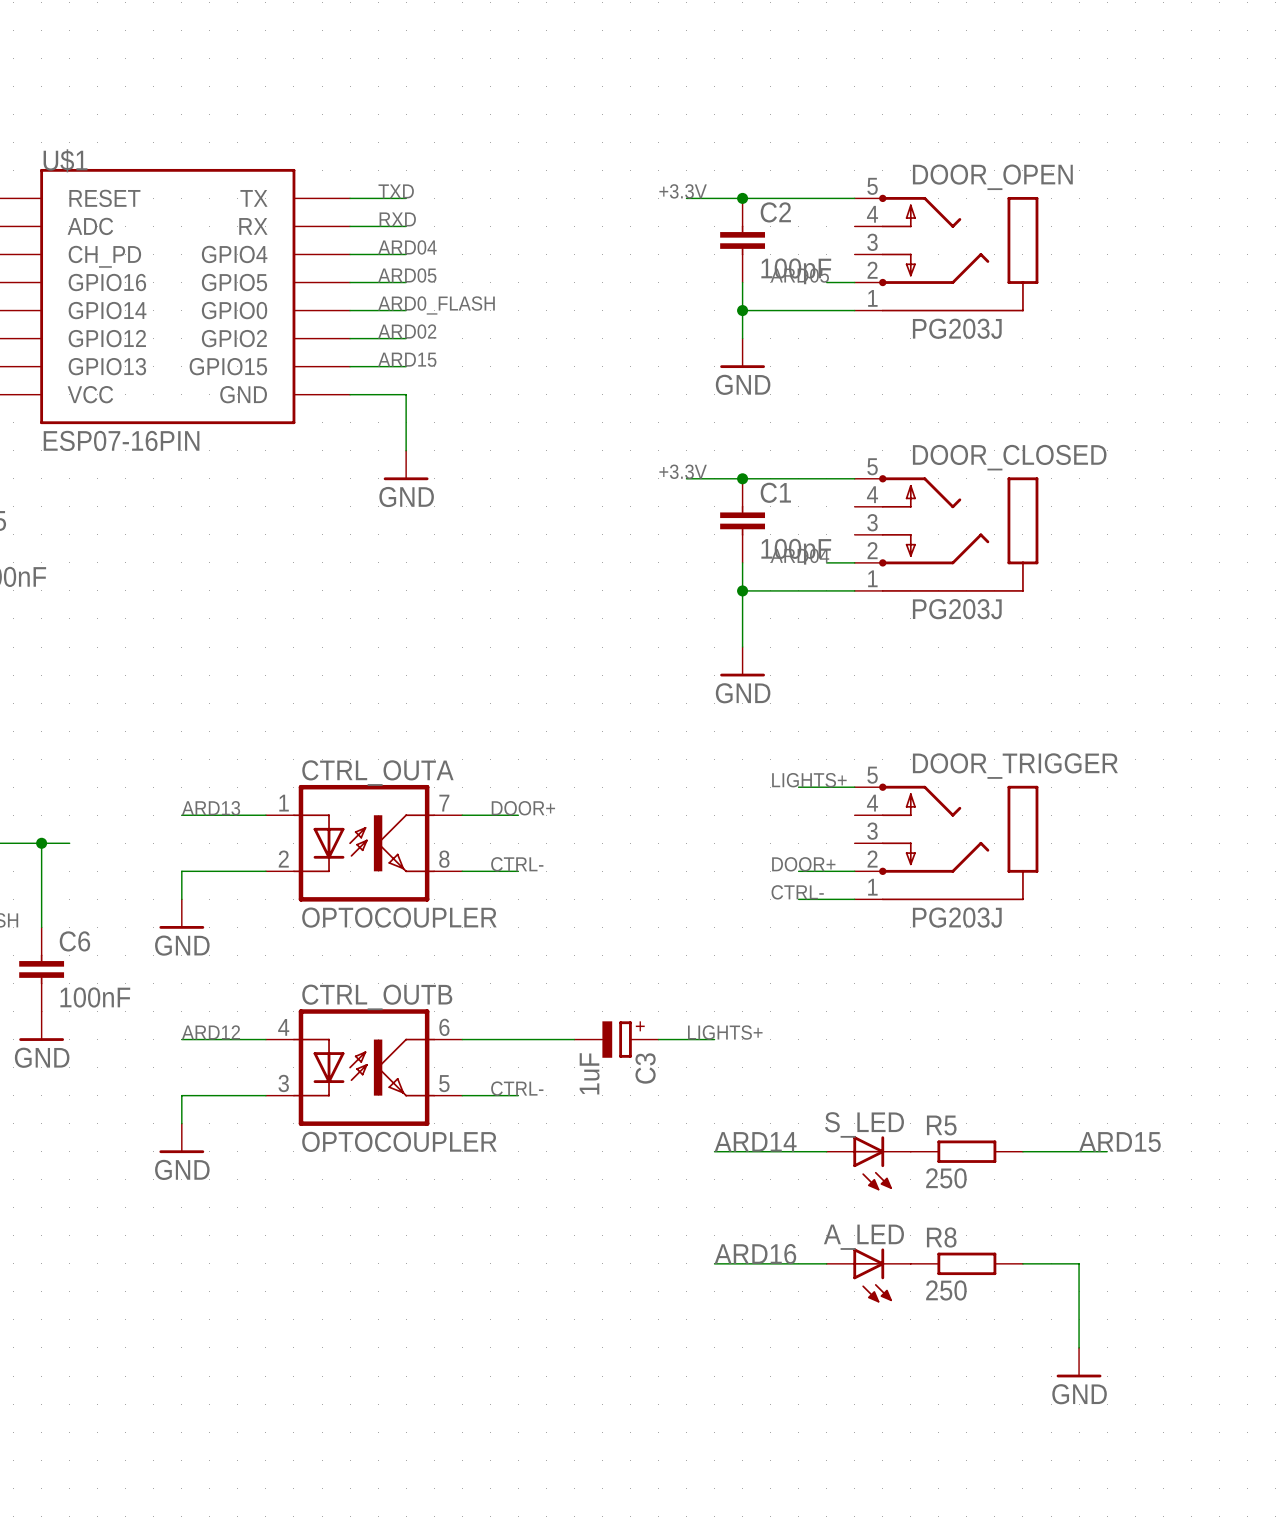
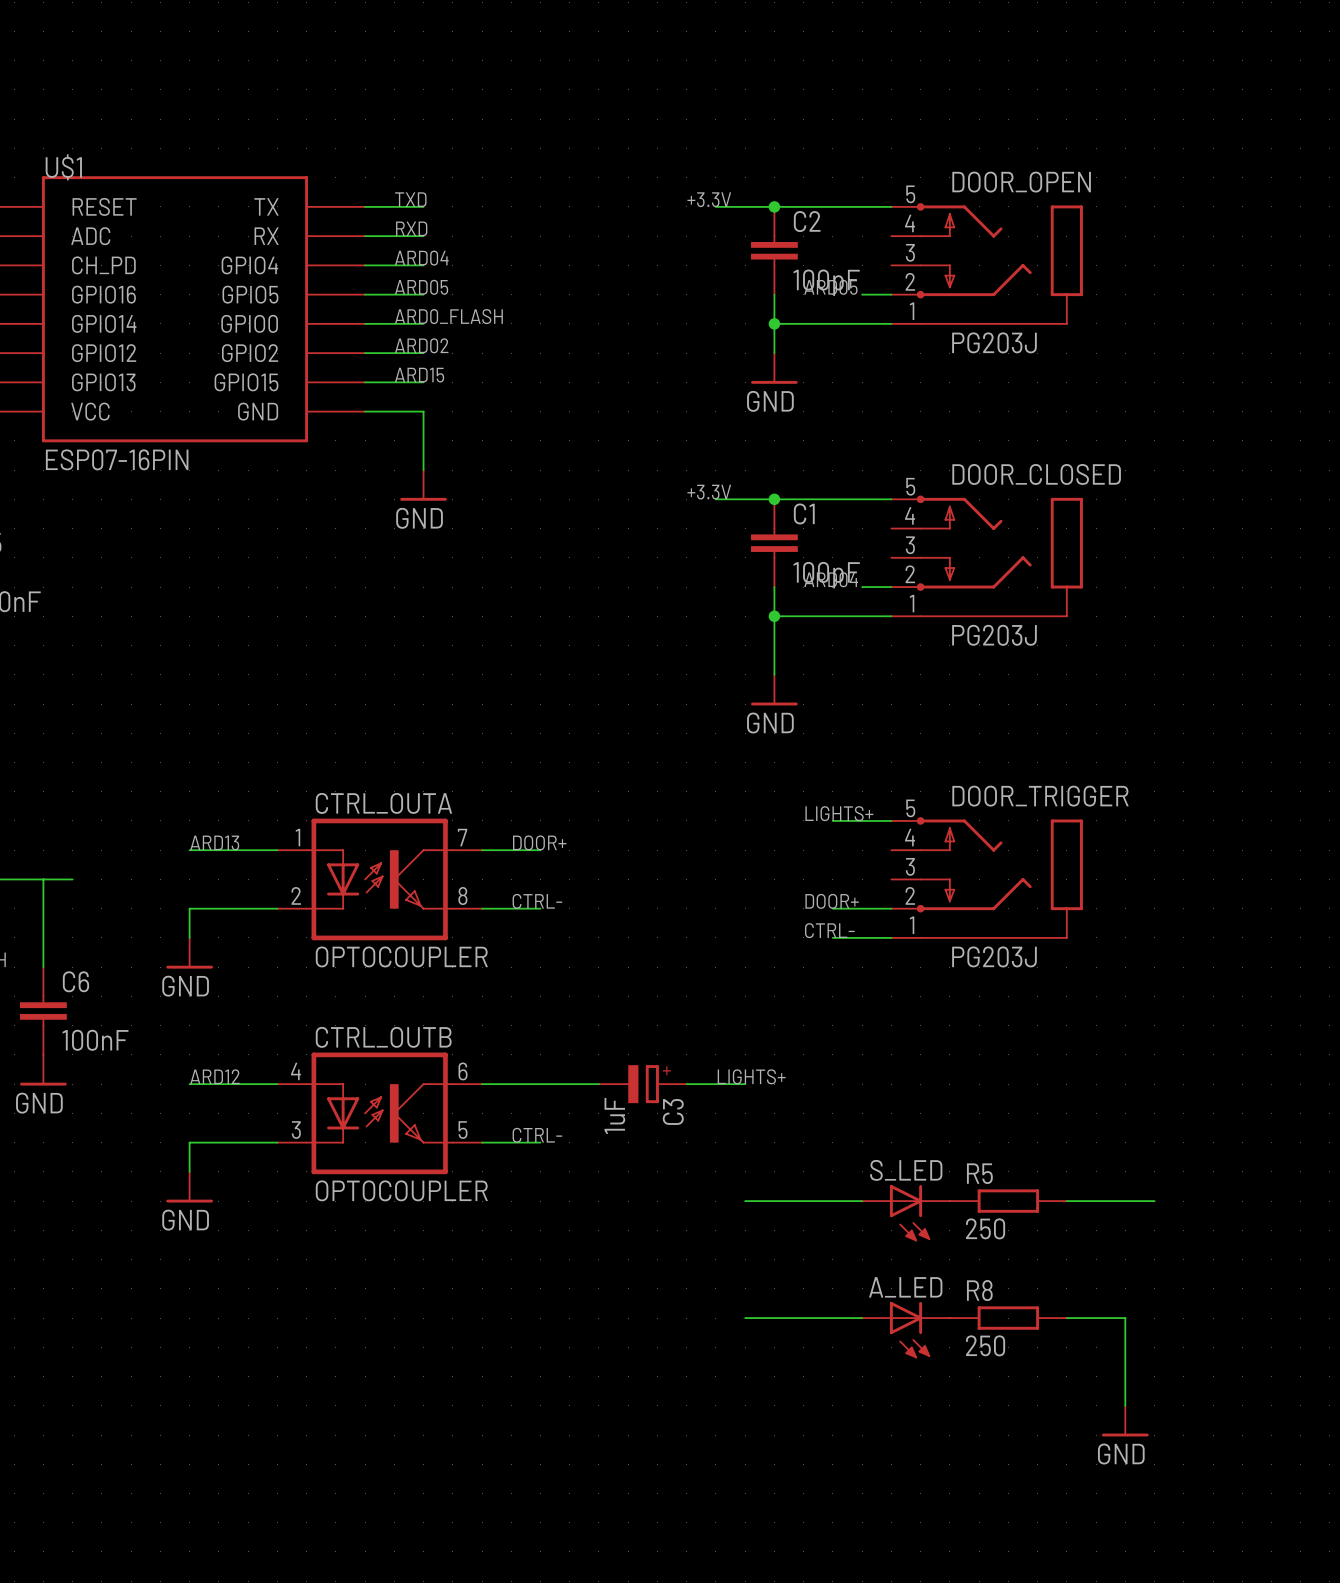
junction: (41, 843) -> none
label: ARD14 (755, 1141) -> none
label: ARD15 (1119, 1142) -> none
label: ARD16 (755, 1254) -> none

